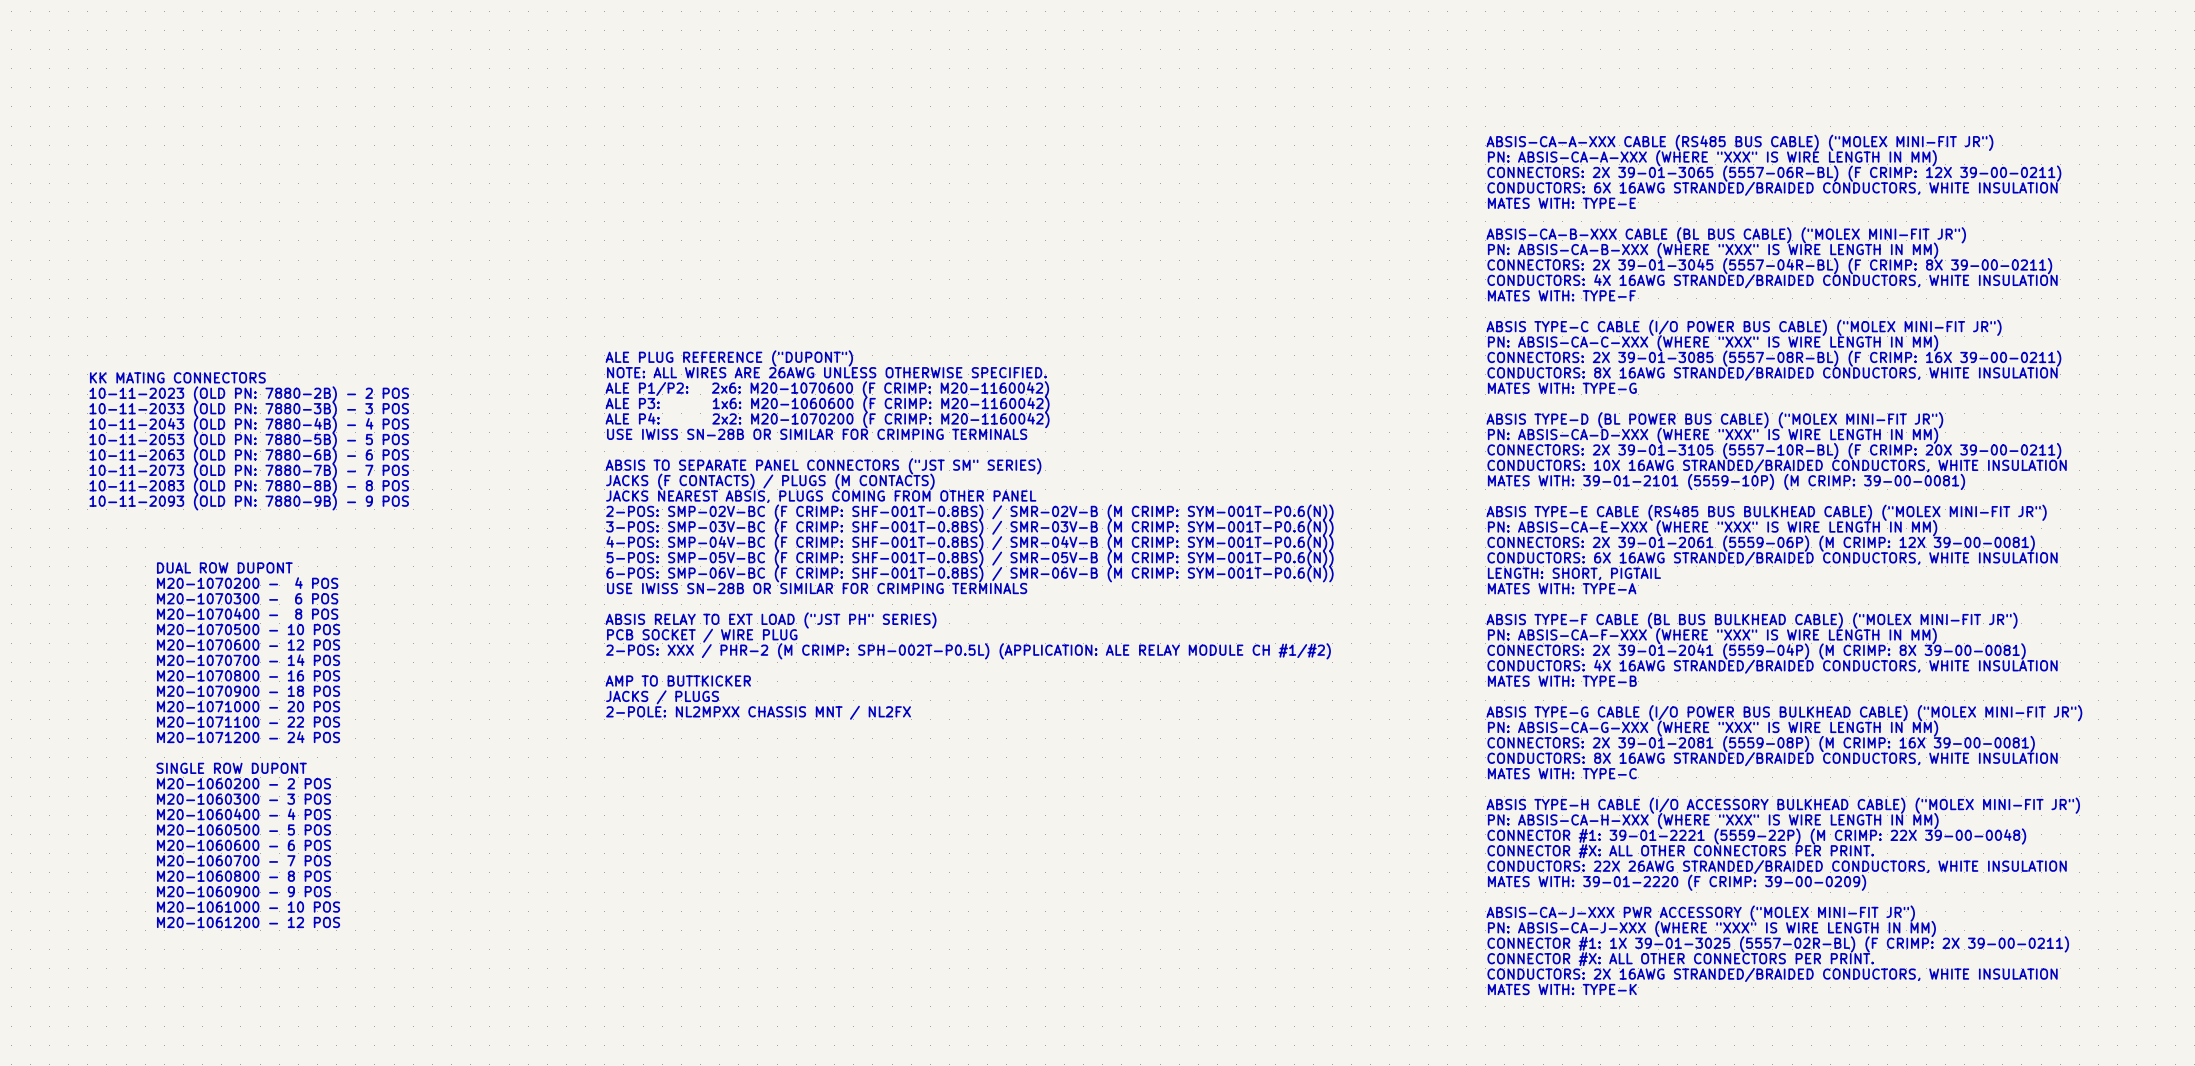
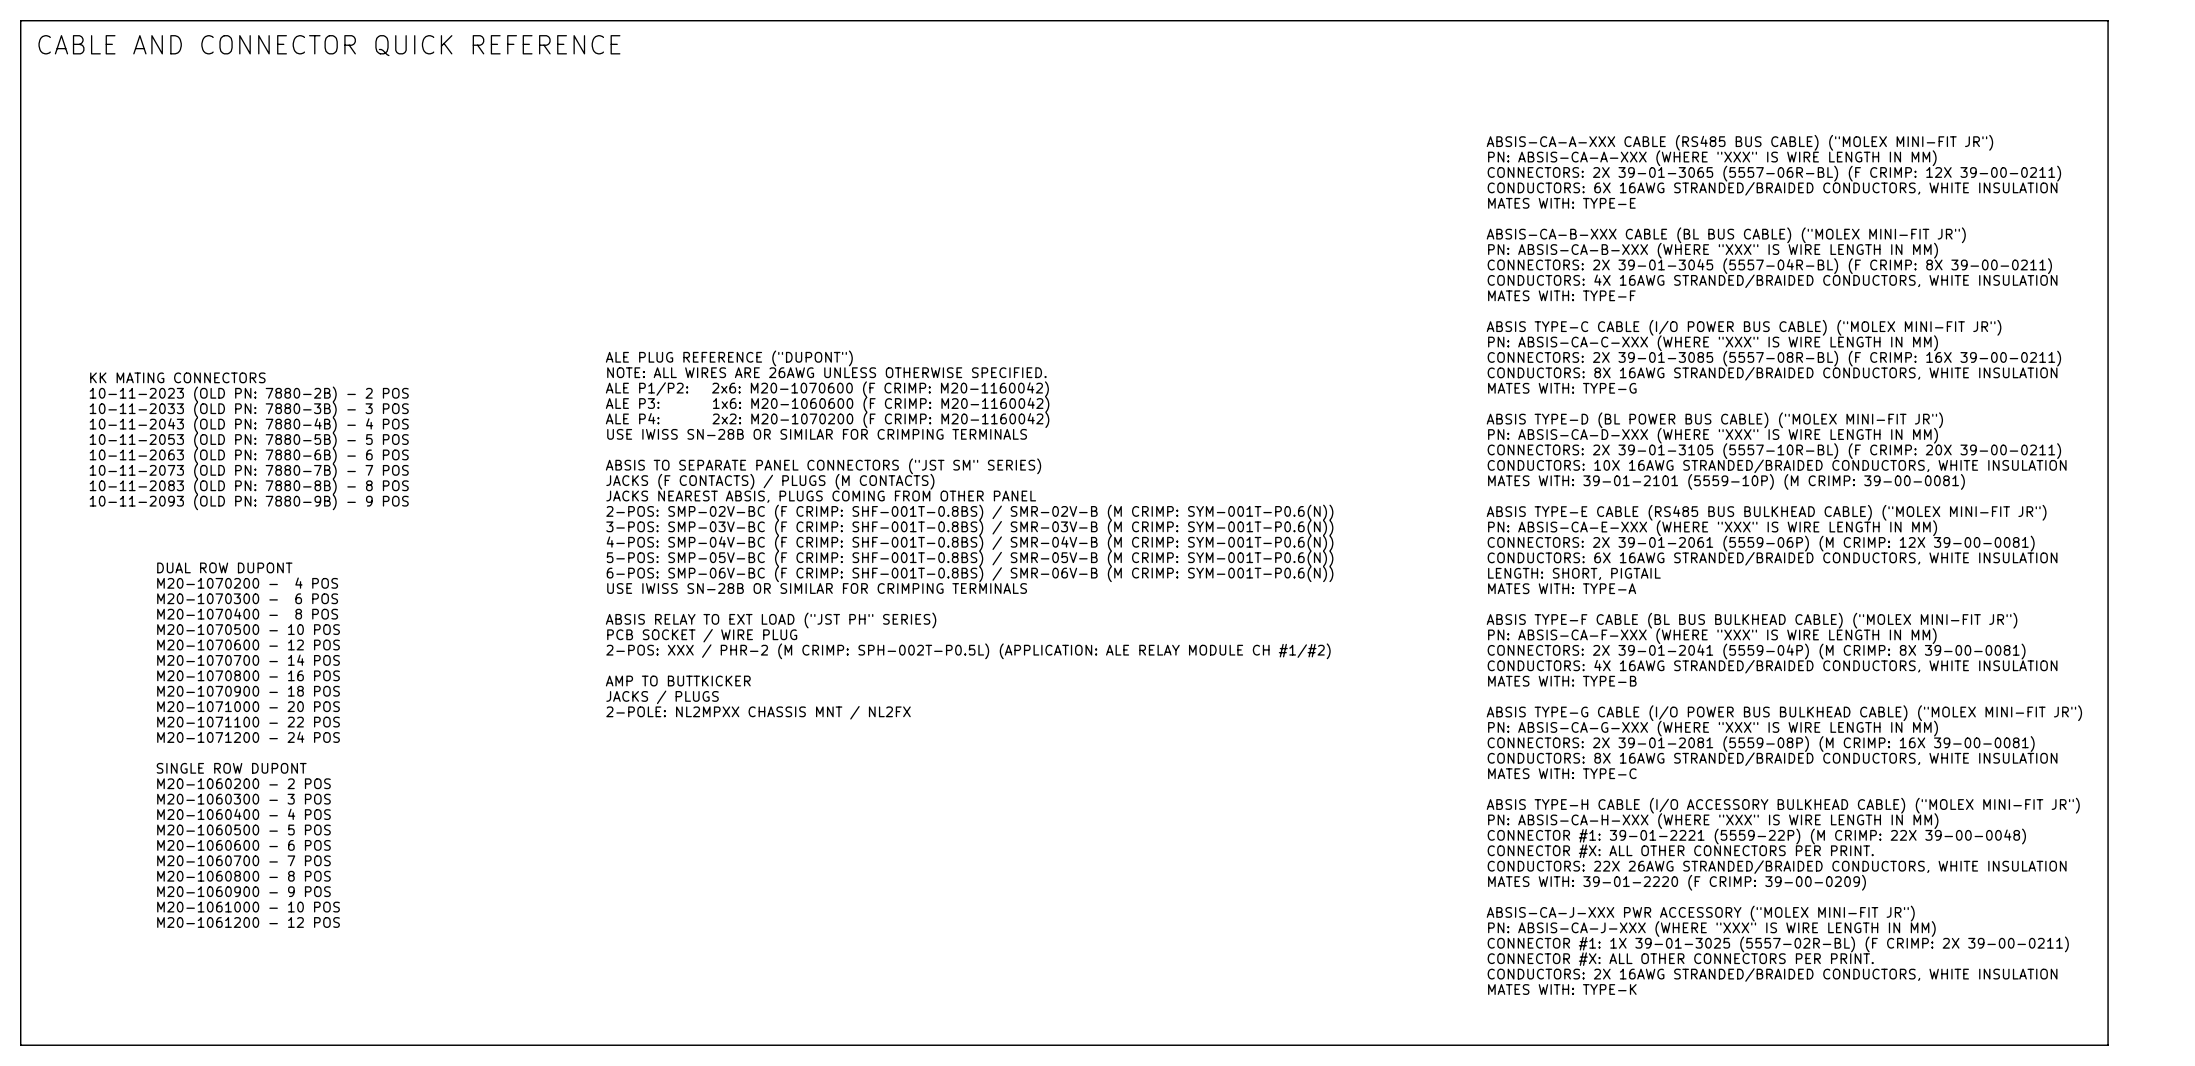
line: none -> (20, 20) (2108, 20) (2108, 1045) (20, 1045) (20, 20)
text: none -> CABLE AND CONNECTOR QUICK REFERENCE (329, 45)

